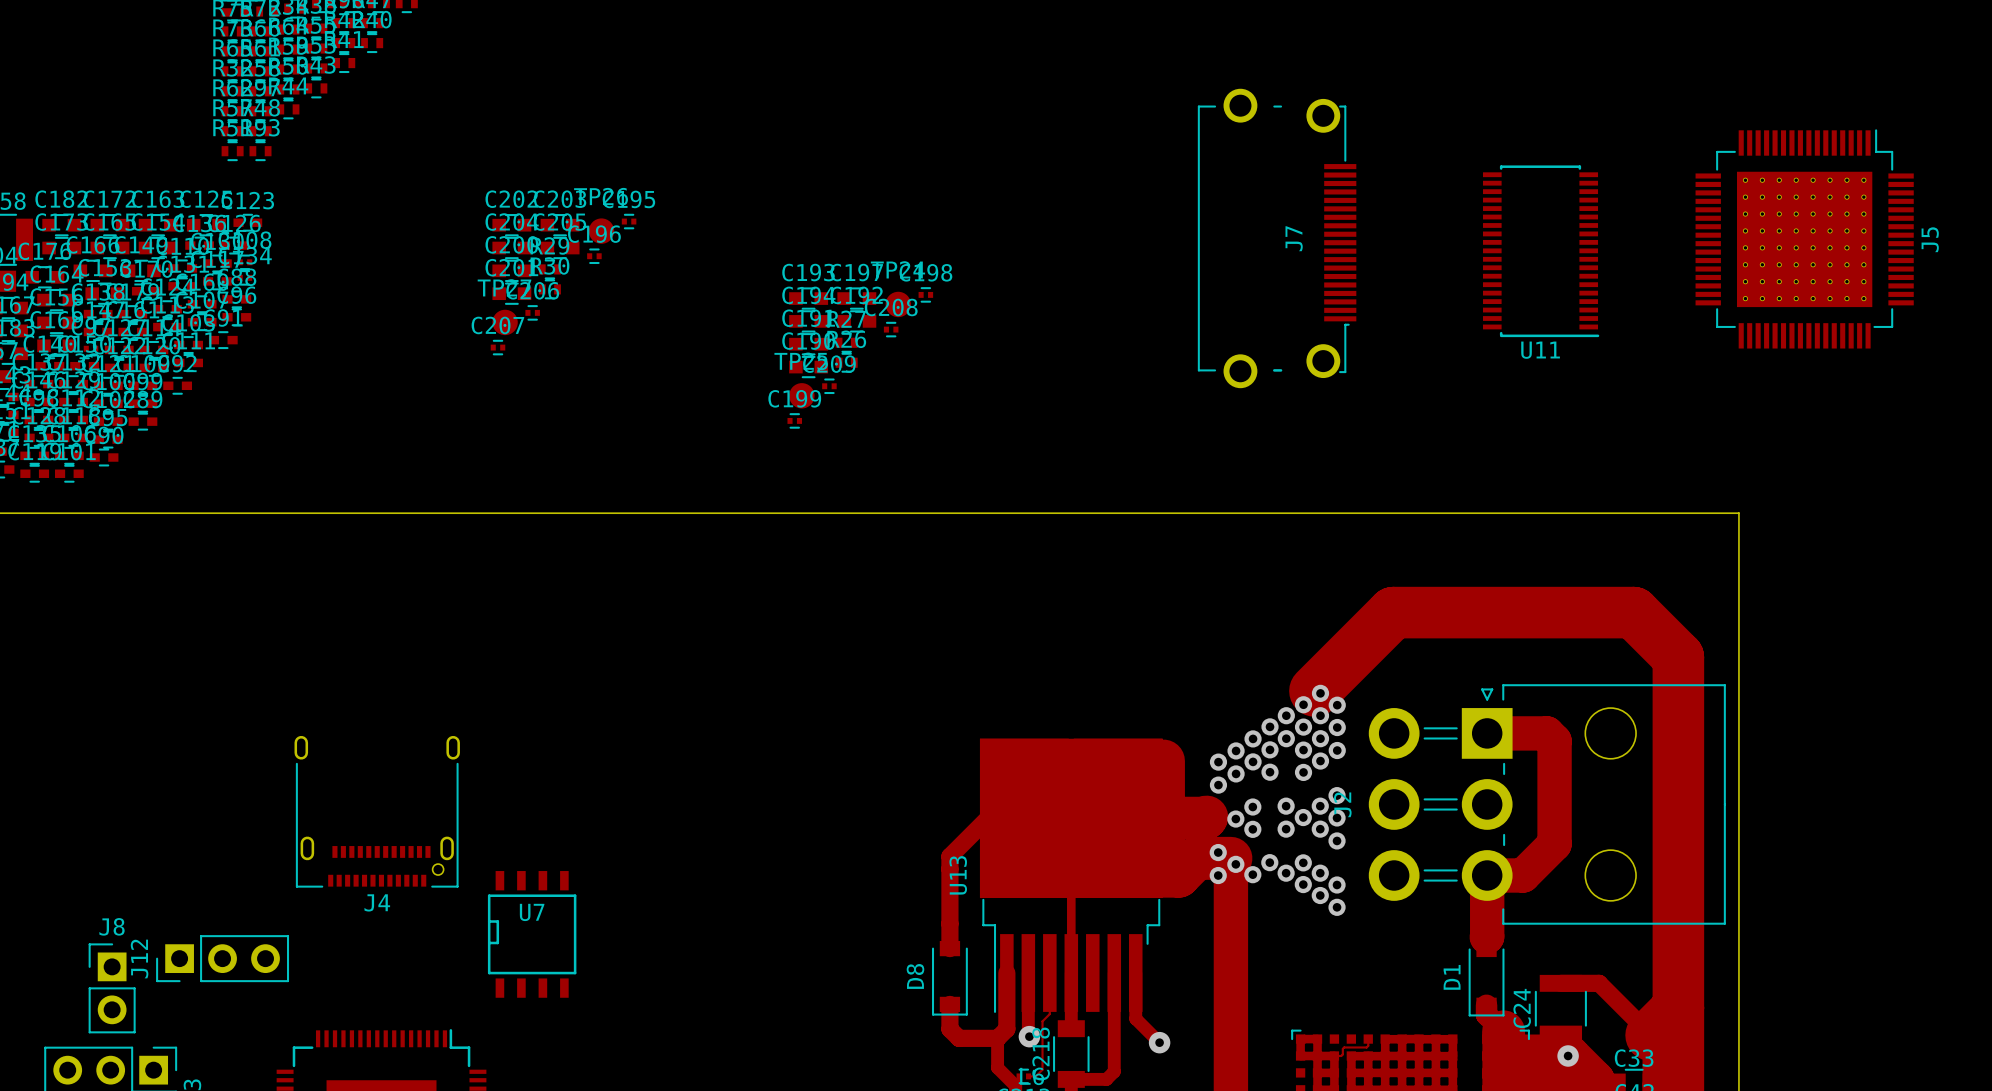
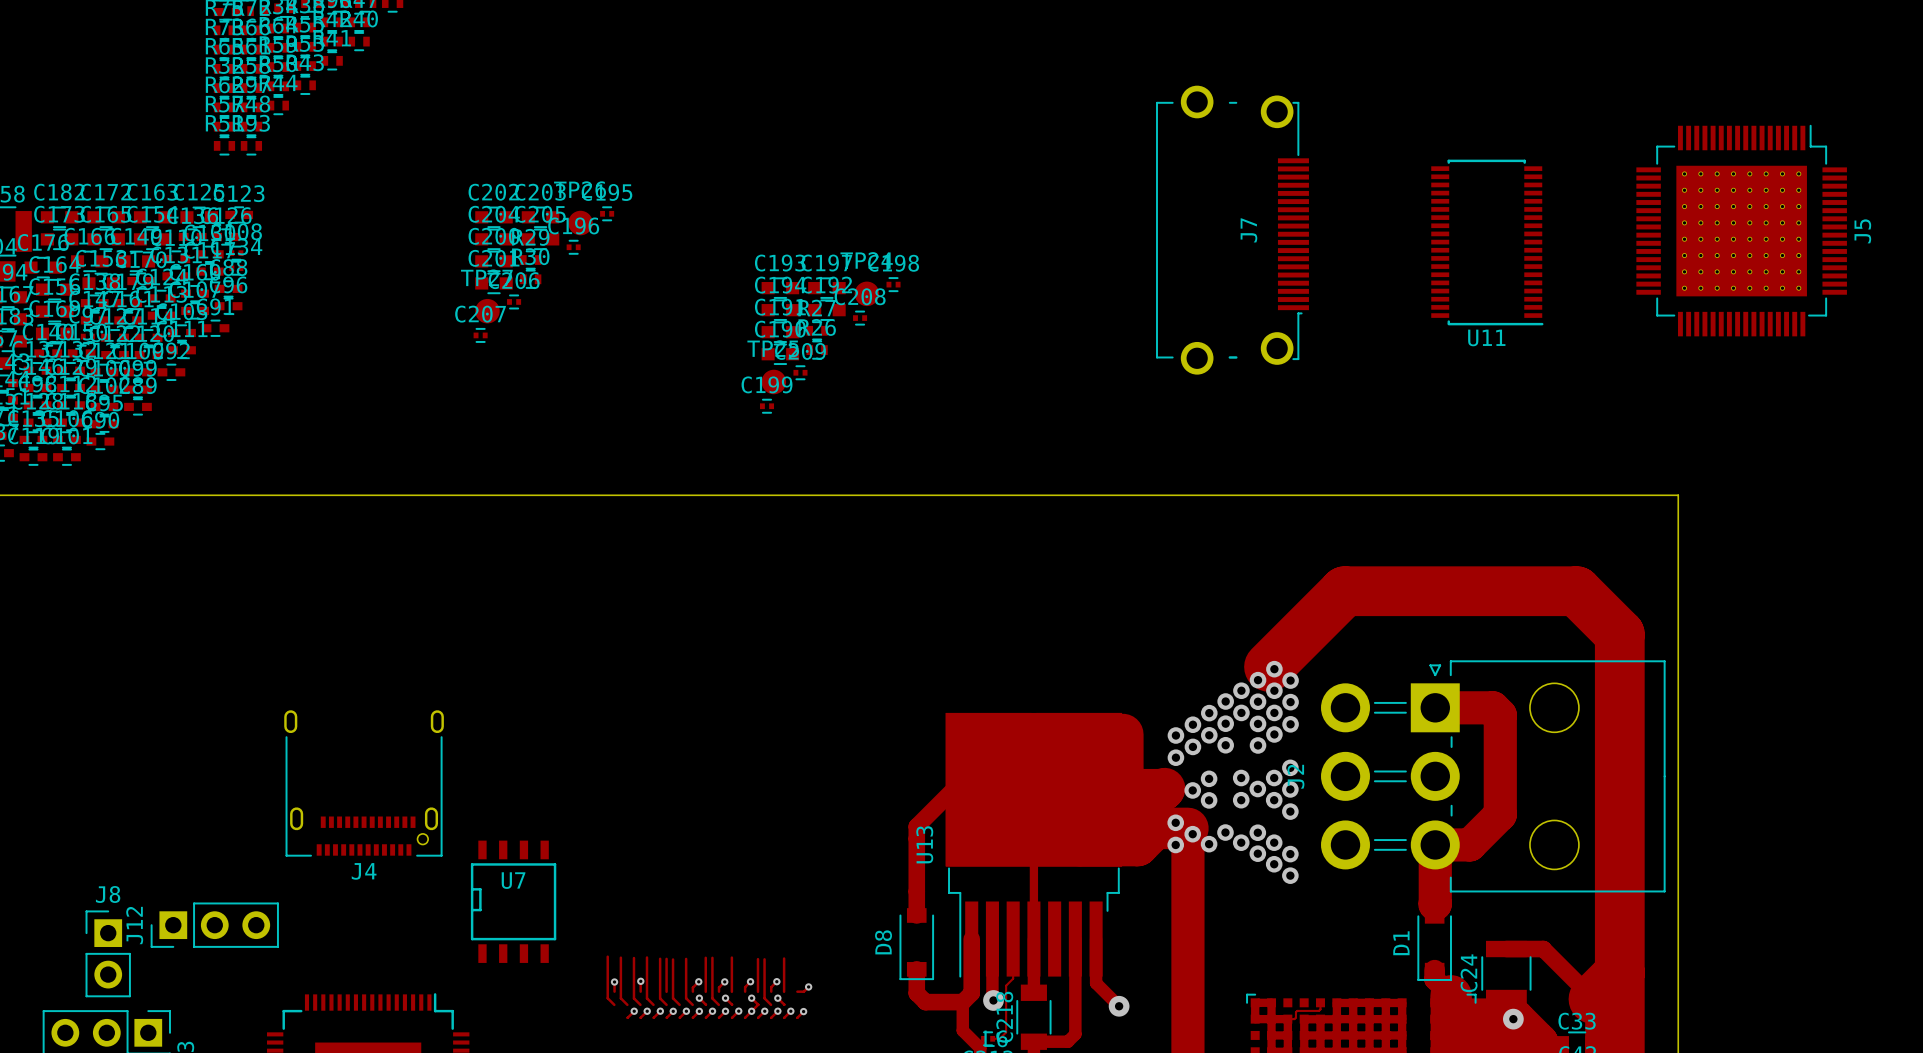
track: none -> (607, 956) (607, 998) (614, 1004)
track: none -> (620, 957) (620, 998) (627, 1004)
track: none -> (633, 958) (633, 998) (640, 1004)
track: none -> (646, 957) (646, 998) (653, 1004)
track: none -> (705, 957) (705, 991)
track: none -> (712, 957) (712, 998) (718, 1004)
track: none -> (731, 957) (731, 991)
track: none -> (660, 958) (660, 998) (666, 1004)
track: none -> (666, 958) (666, 991)
track: none -> (686, 958) (686, 998) (692, 1004)
track: none -> (757, 959) (757, 991)
track: none -> (784, 958) (784, 991)
track: none -> (673, 959) (673, 998) (679, 1004)
track: none -> (764, 959) (764, 998) (771, 1004)
track: none -> (640, 981) (640, 991)
via: none -> (640, 981)
track: none -> (614, 982) (614, 991)
via: none -> (614, 982)
track: none -> (698, 981) (692, 987) (692, 991)
via: none -> (698, 981)
track: none -> (724, 981) (719, 987) (719, 991)
via: none -> (724, 981)
track: none -> (750, 981) (745, 987) (745, 991)
via: none -> (750, 981)
track: none -> (776, 981) (771, 987) (771, 991)
via: none -> (776, 981)
track: none -> (808, 986) (803, 991) (797, 991)
via: none -> (808, 986)
track: none -> (699, 998) (705, 1004)
via: none -> (699, 998)
track: none -> (725, 998) (732, 1004)
via: none -> (725, 998)
track: none -> (751, 998) (758, 1004) (745, 1017)
via: none -> (751, 998)
track: none -> (777, 998) (784, 1004)
via: none -> (777, 998)
track: none -> (634, 1011) (627, 1017)
via: none -> (634, 1011)
track: none -> (647, 1011) (640, 1017)
via: none -> (647, 1011)
track: none -> (660, 1011) (653, 1017)
via: none -> (660, 1011)
track: none -> (673, 1011) (666, 1017)
via: none -> (673, 1011)
track: none -> (686, 1011) (679, 1017)
via: none -> (686, 1011)
track: none -> (699, 1011) (692, 1017)
via: none -> (699, 1011)
track: none -> (712, 1011) (705, 1017)
via: none -> (712, 1011)
track: none -> (725, 1011) (719, 1017)
via: none -> (725, 1011)
track: none -> (738, 1011) (732, 1017)
via: none -> (738, 1011)
via: none -> (751, 1011)
track: none -> (764, 1011) (758, 1017)
via: none -> (764, 1011)
track: none -> (777, 1011) (771, 1017)
via: none -> (777, 1011)
track: none -> (790, 1011) (784, 1017)
via: none -> (790, 1011)
track: none -> (803, 1011) (797, 1017)
via: none -> (803, 1011)

